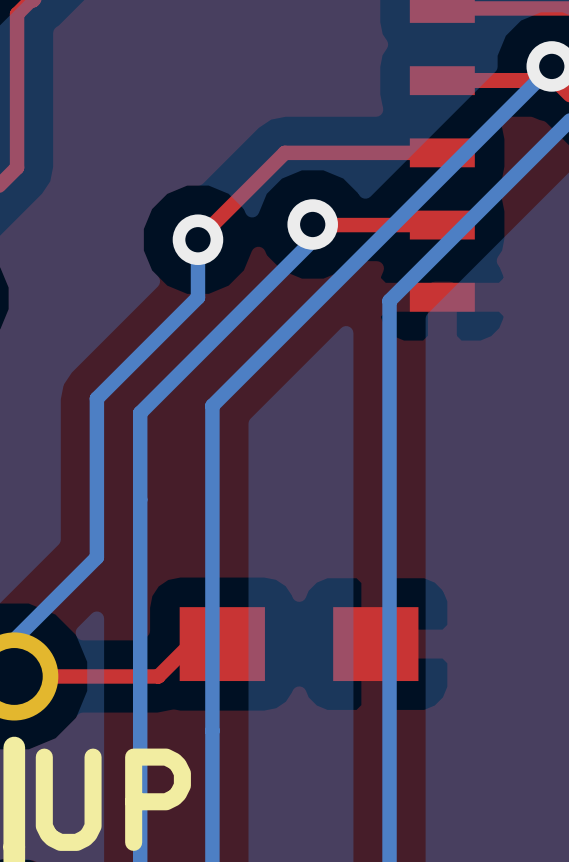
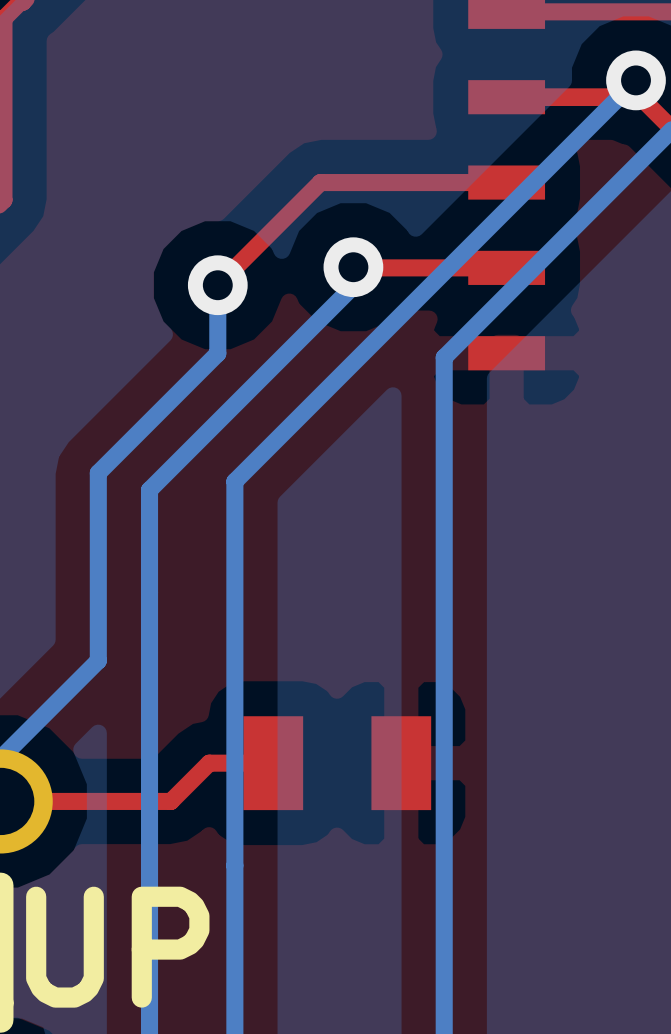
part footprint: [179, 607, 419, 682] -> [243, 716, 432, 811]

